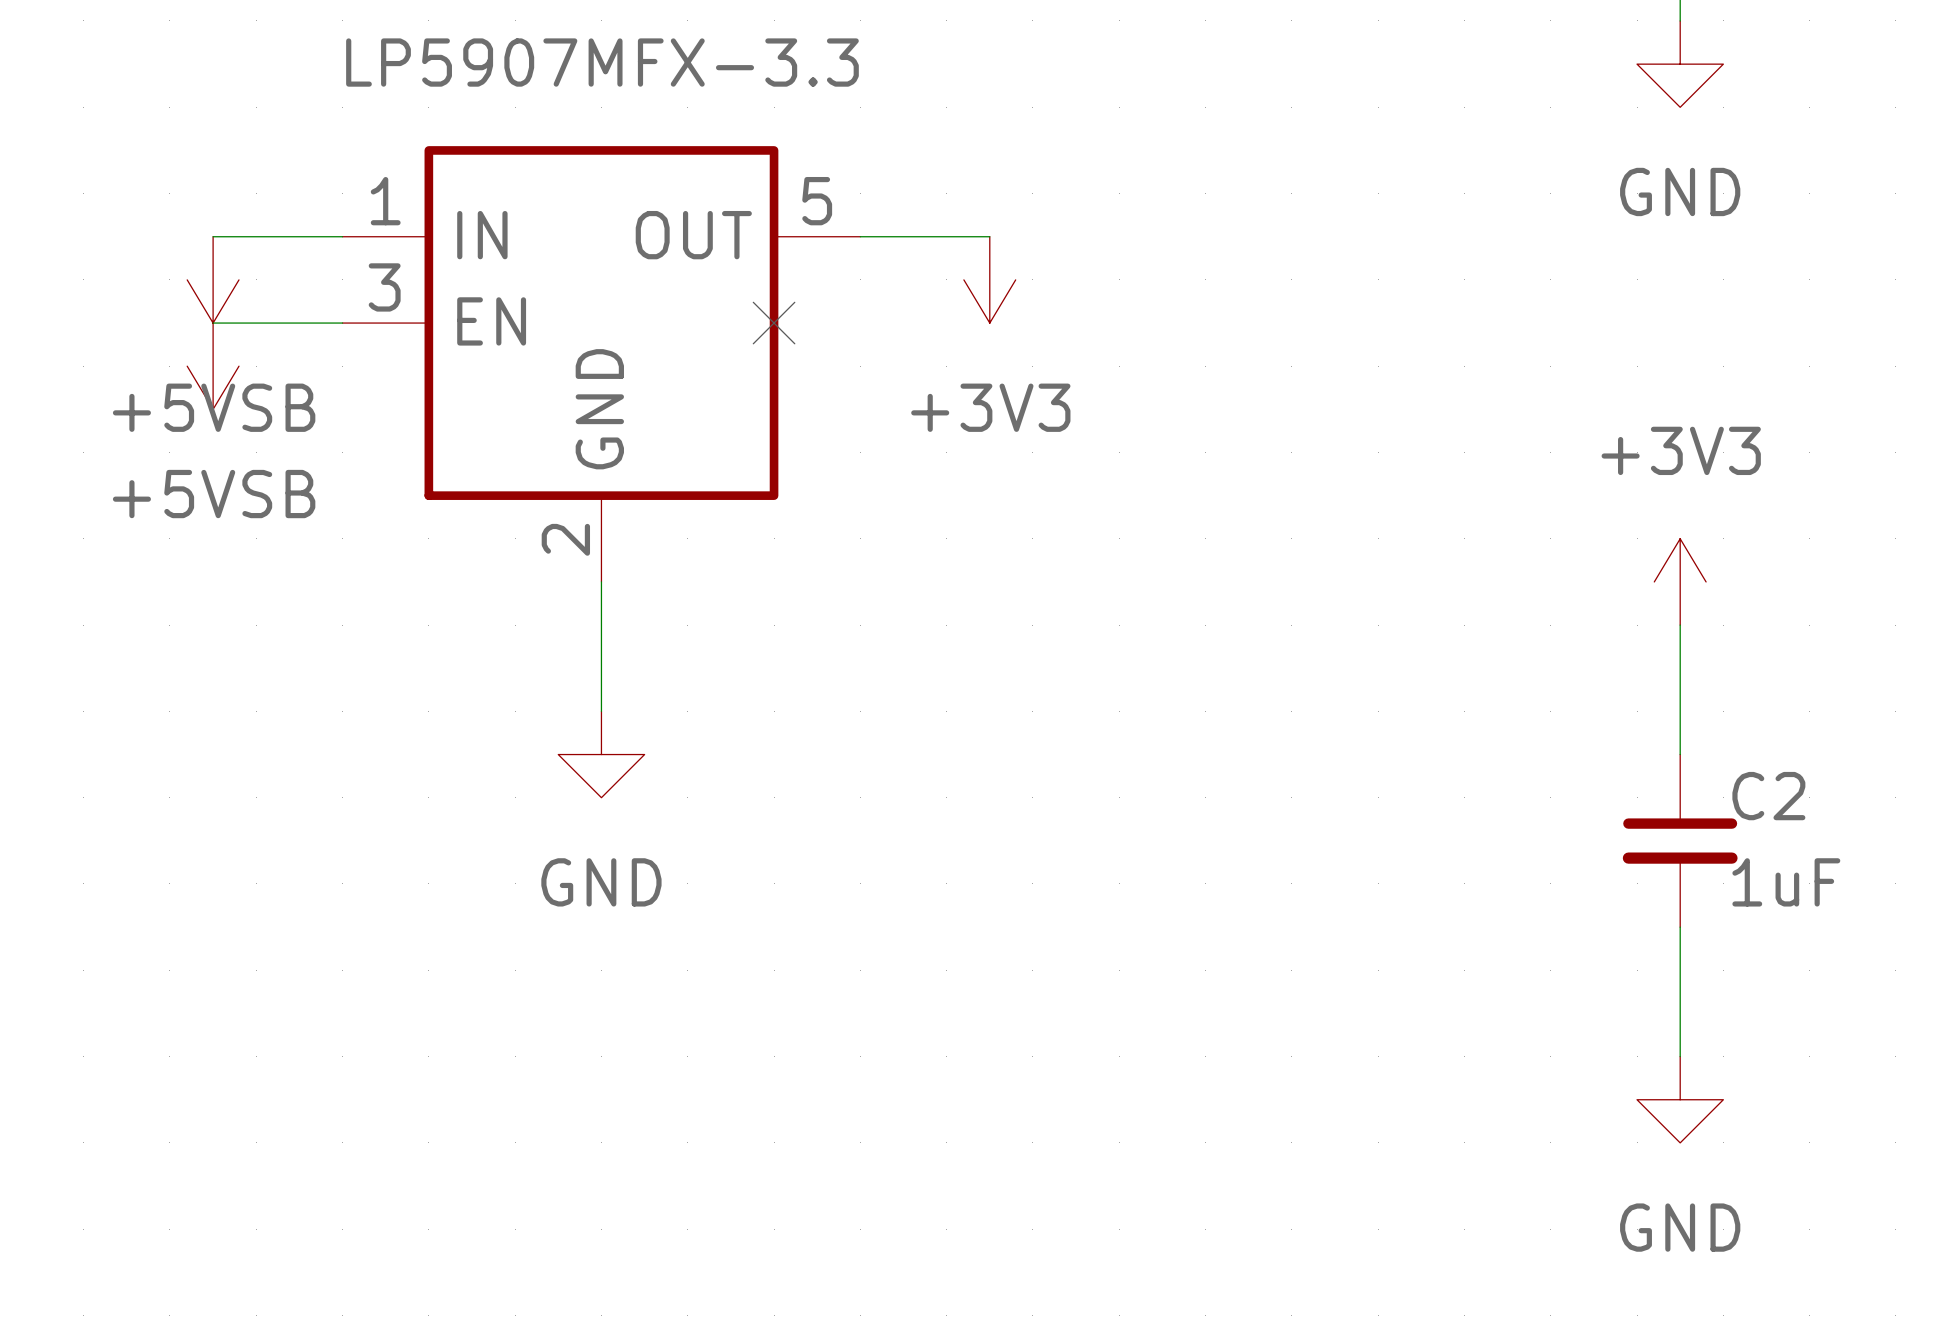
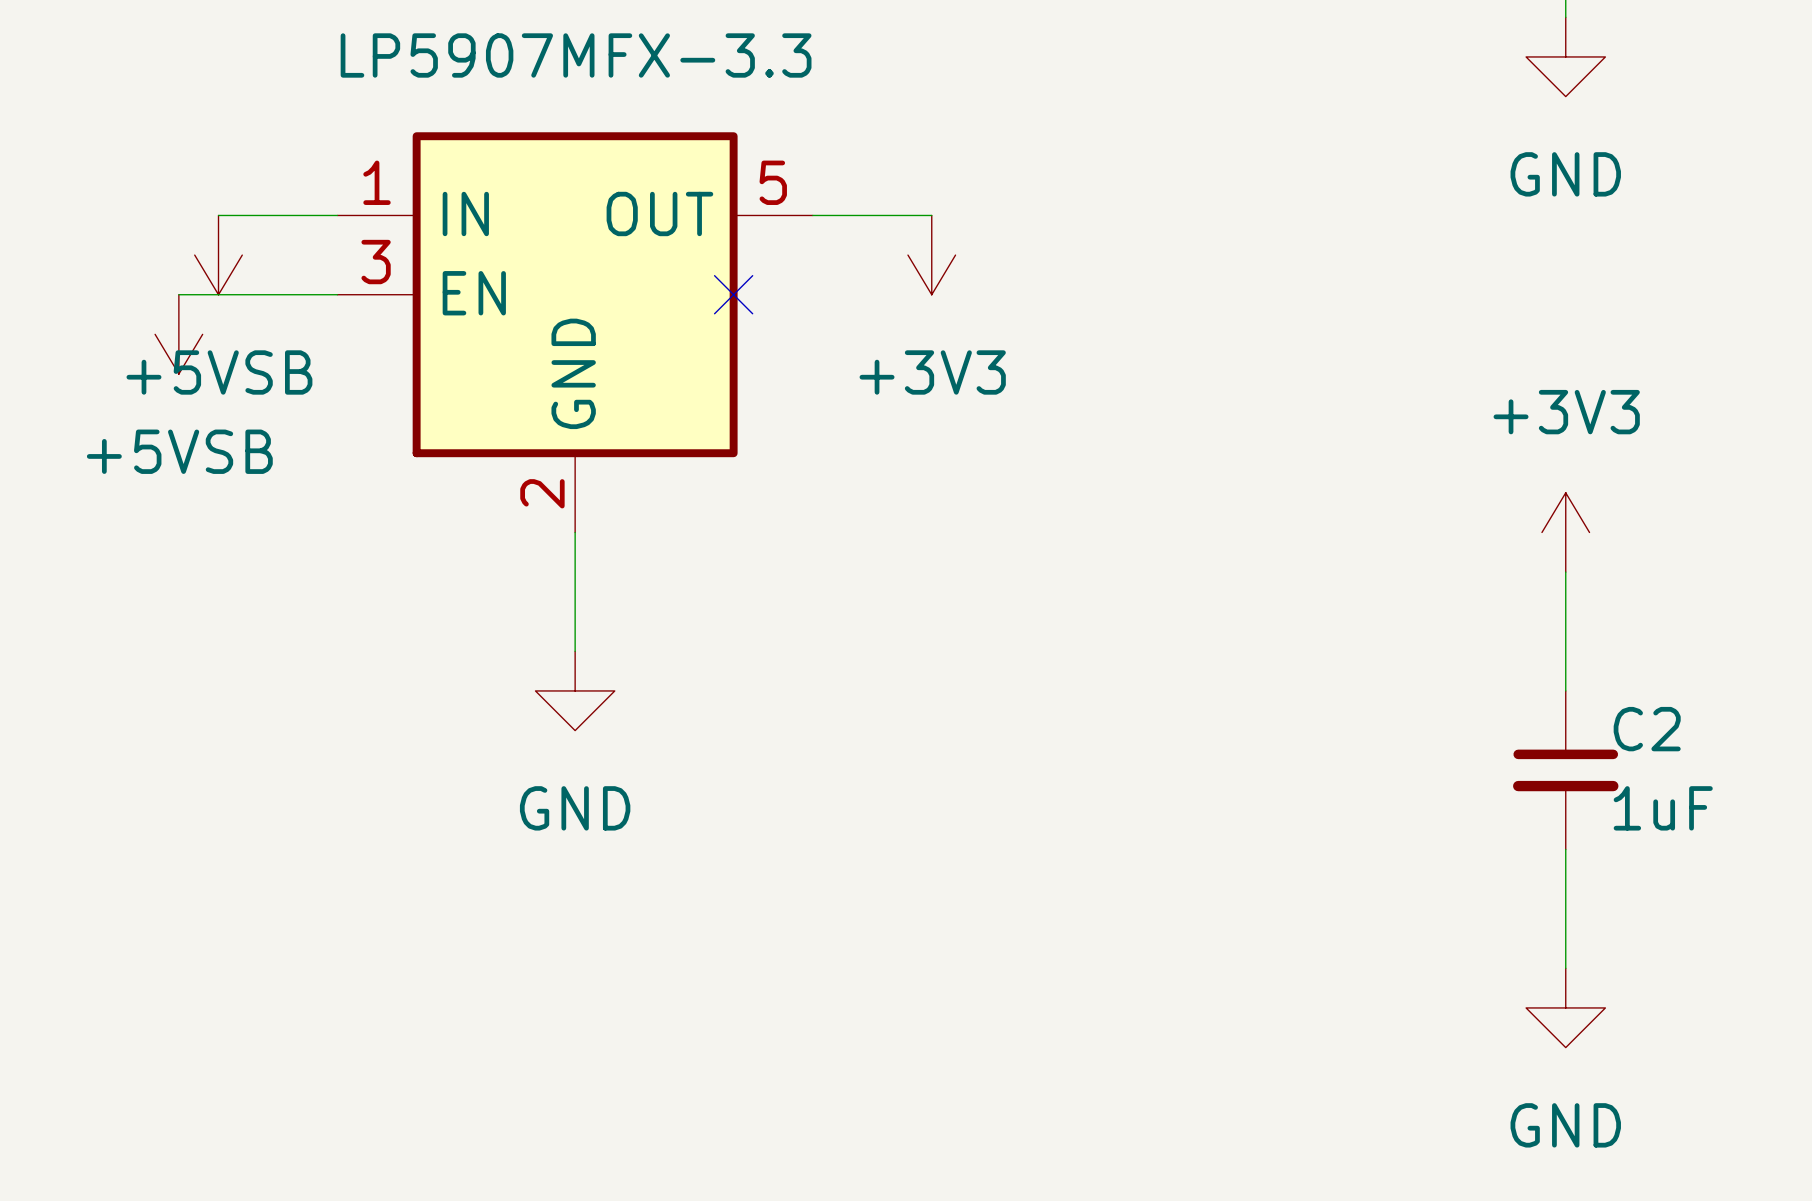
wire: none -> (178, 294) (218, 294)
power symbol position: +5VSB (213, 366) -> +5VSB (178, 334)

